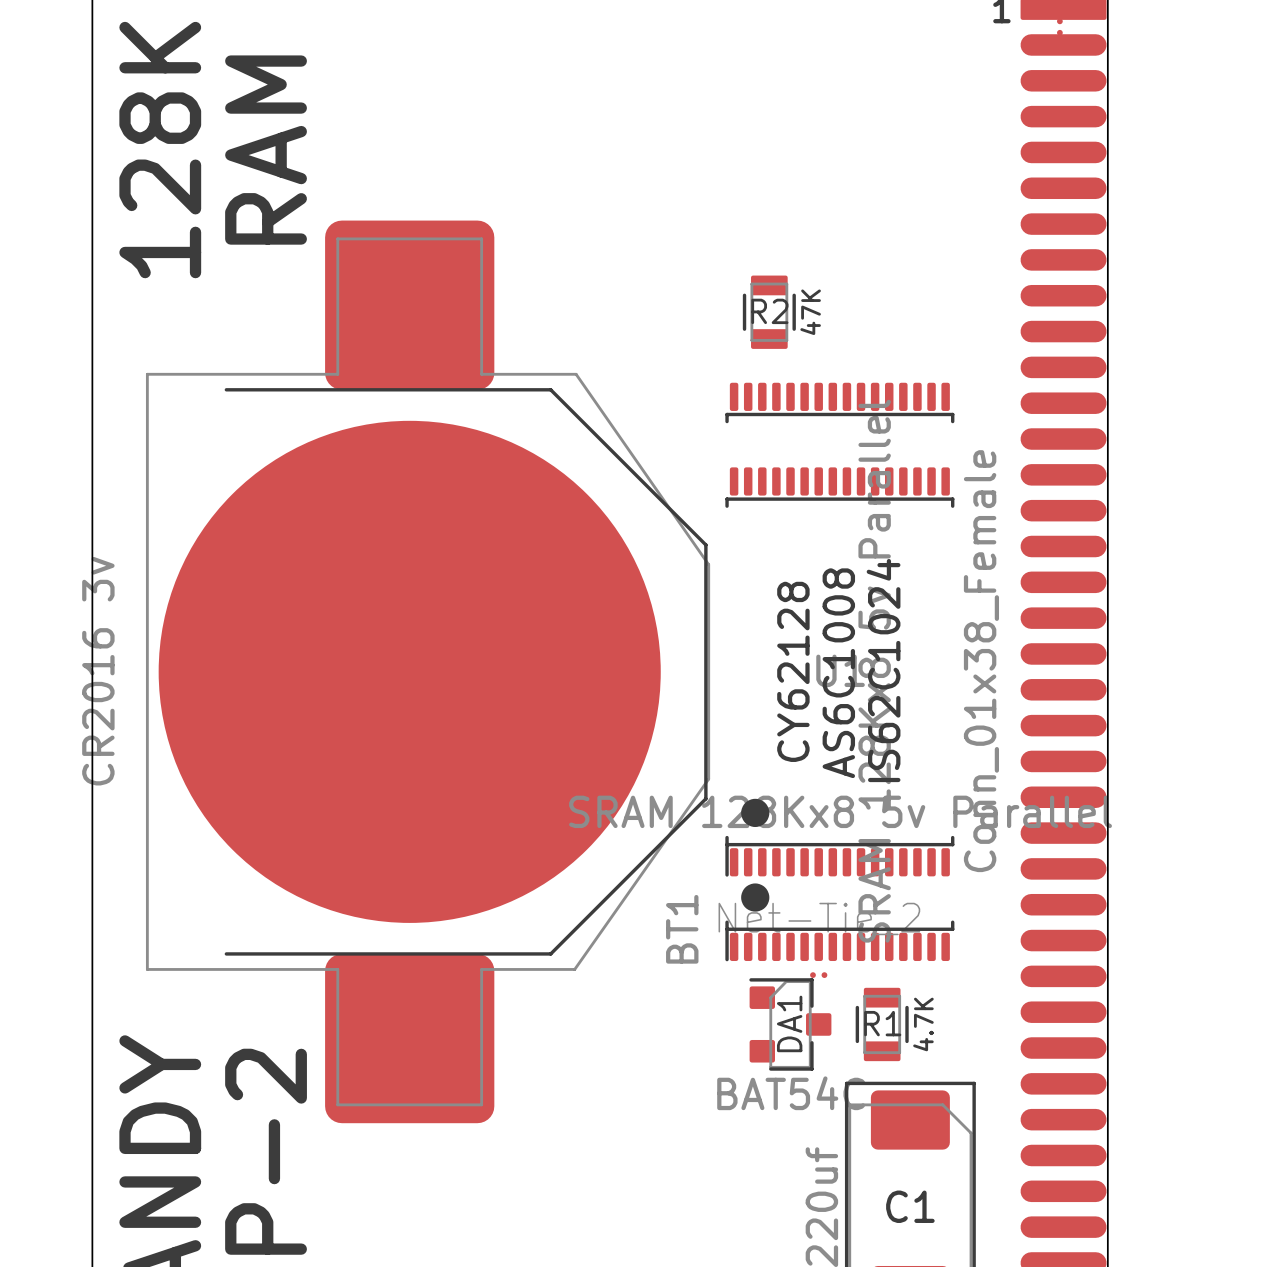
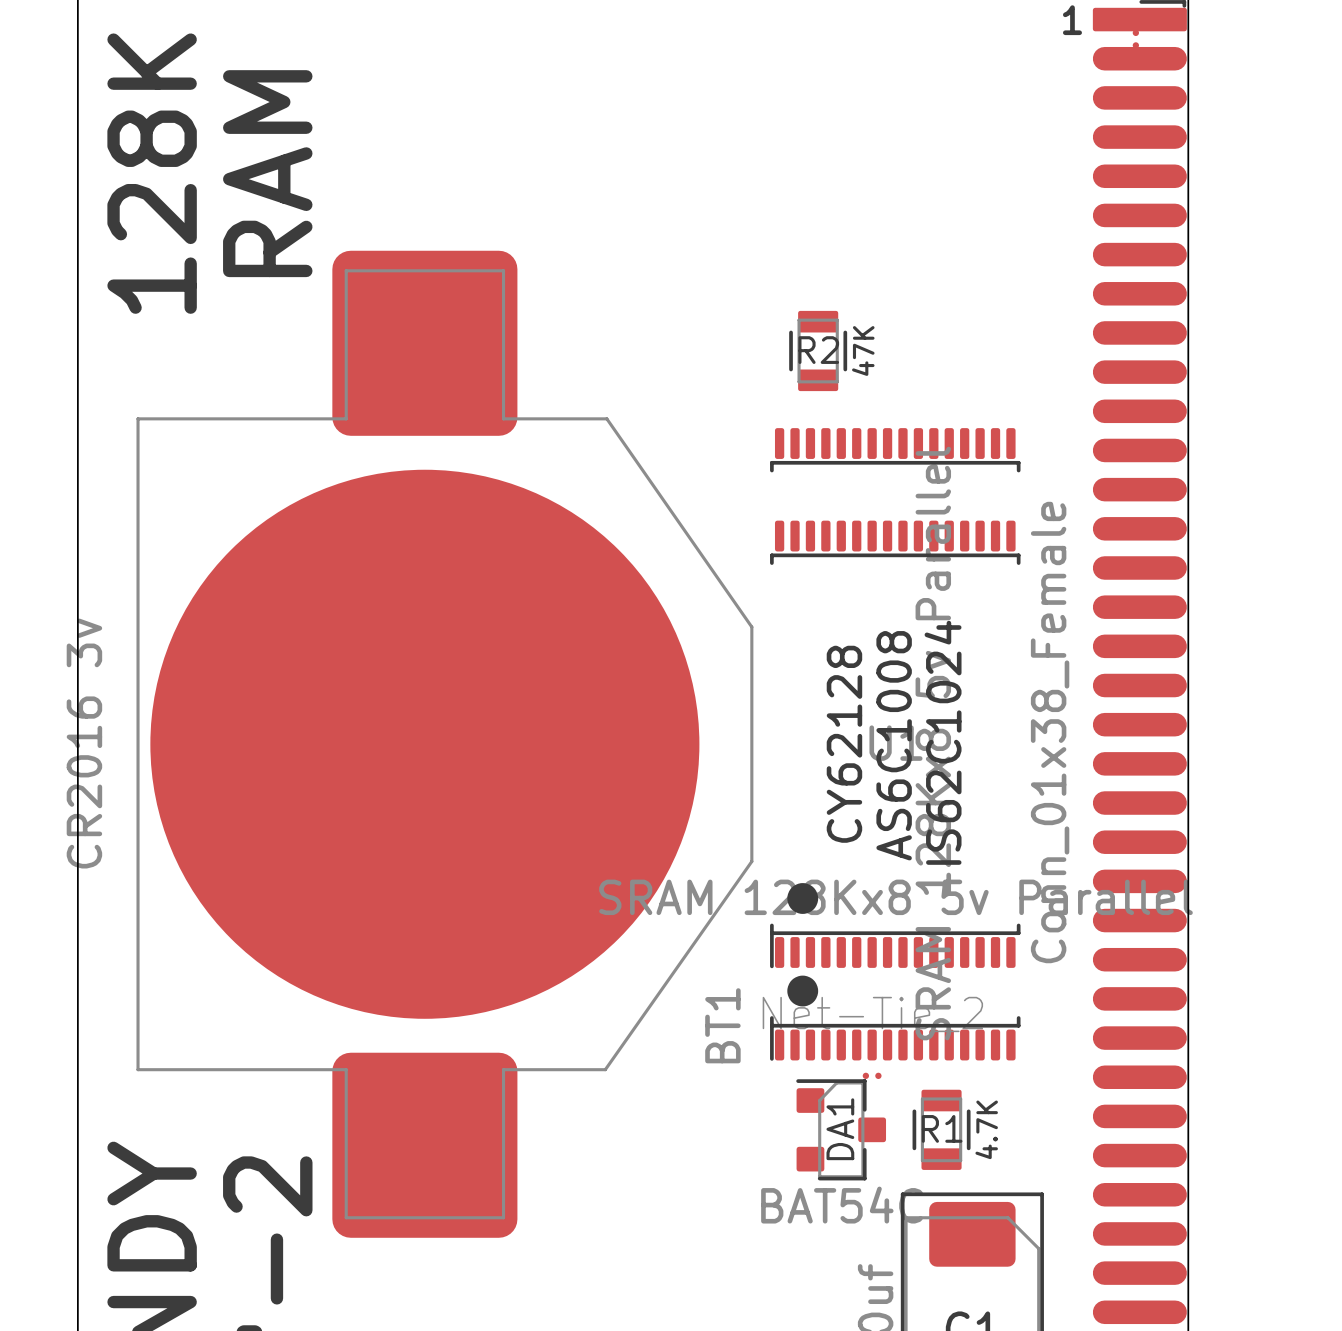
BT1 footprint: [145, 220, 711, 1124] -> [136, 250, 754, 1238]

